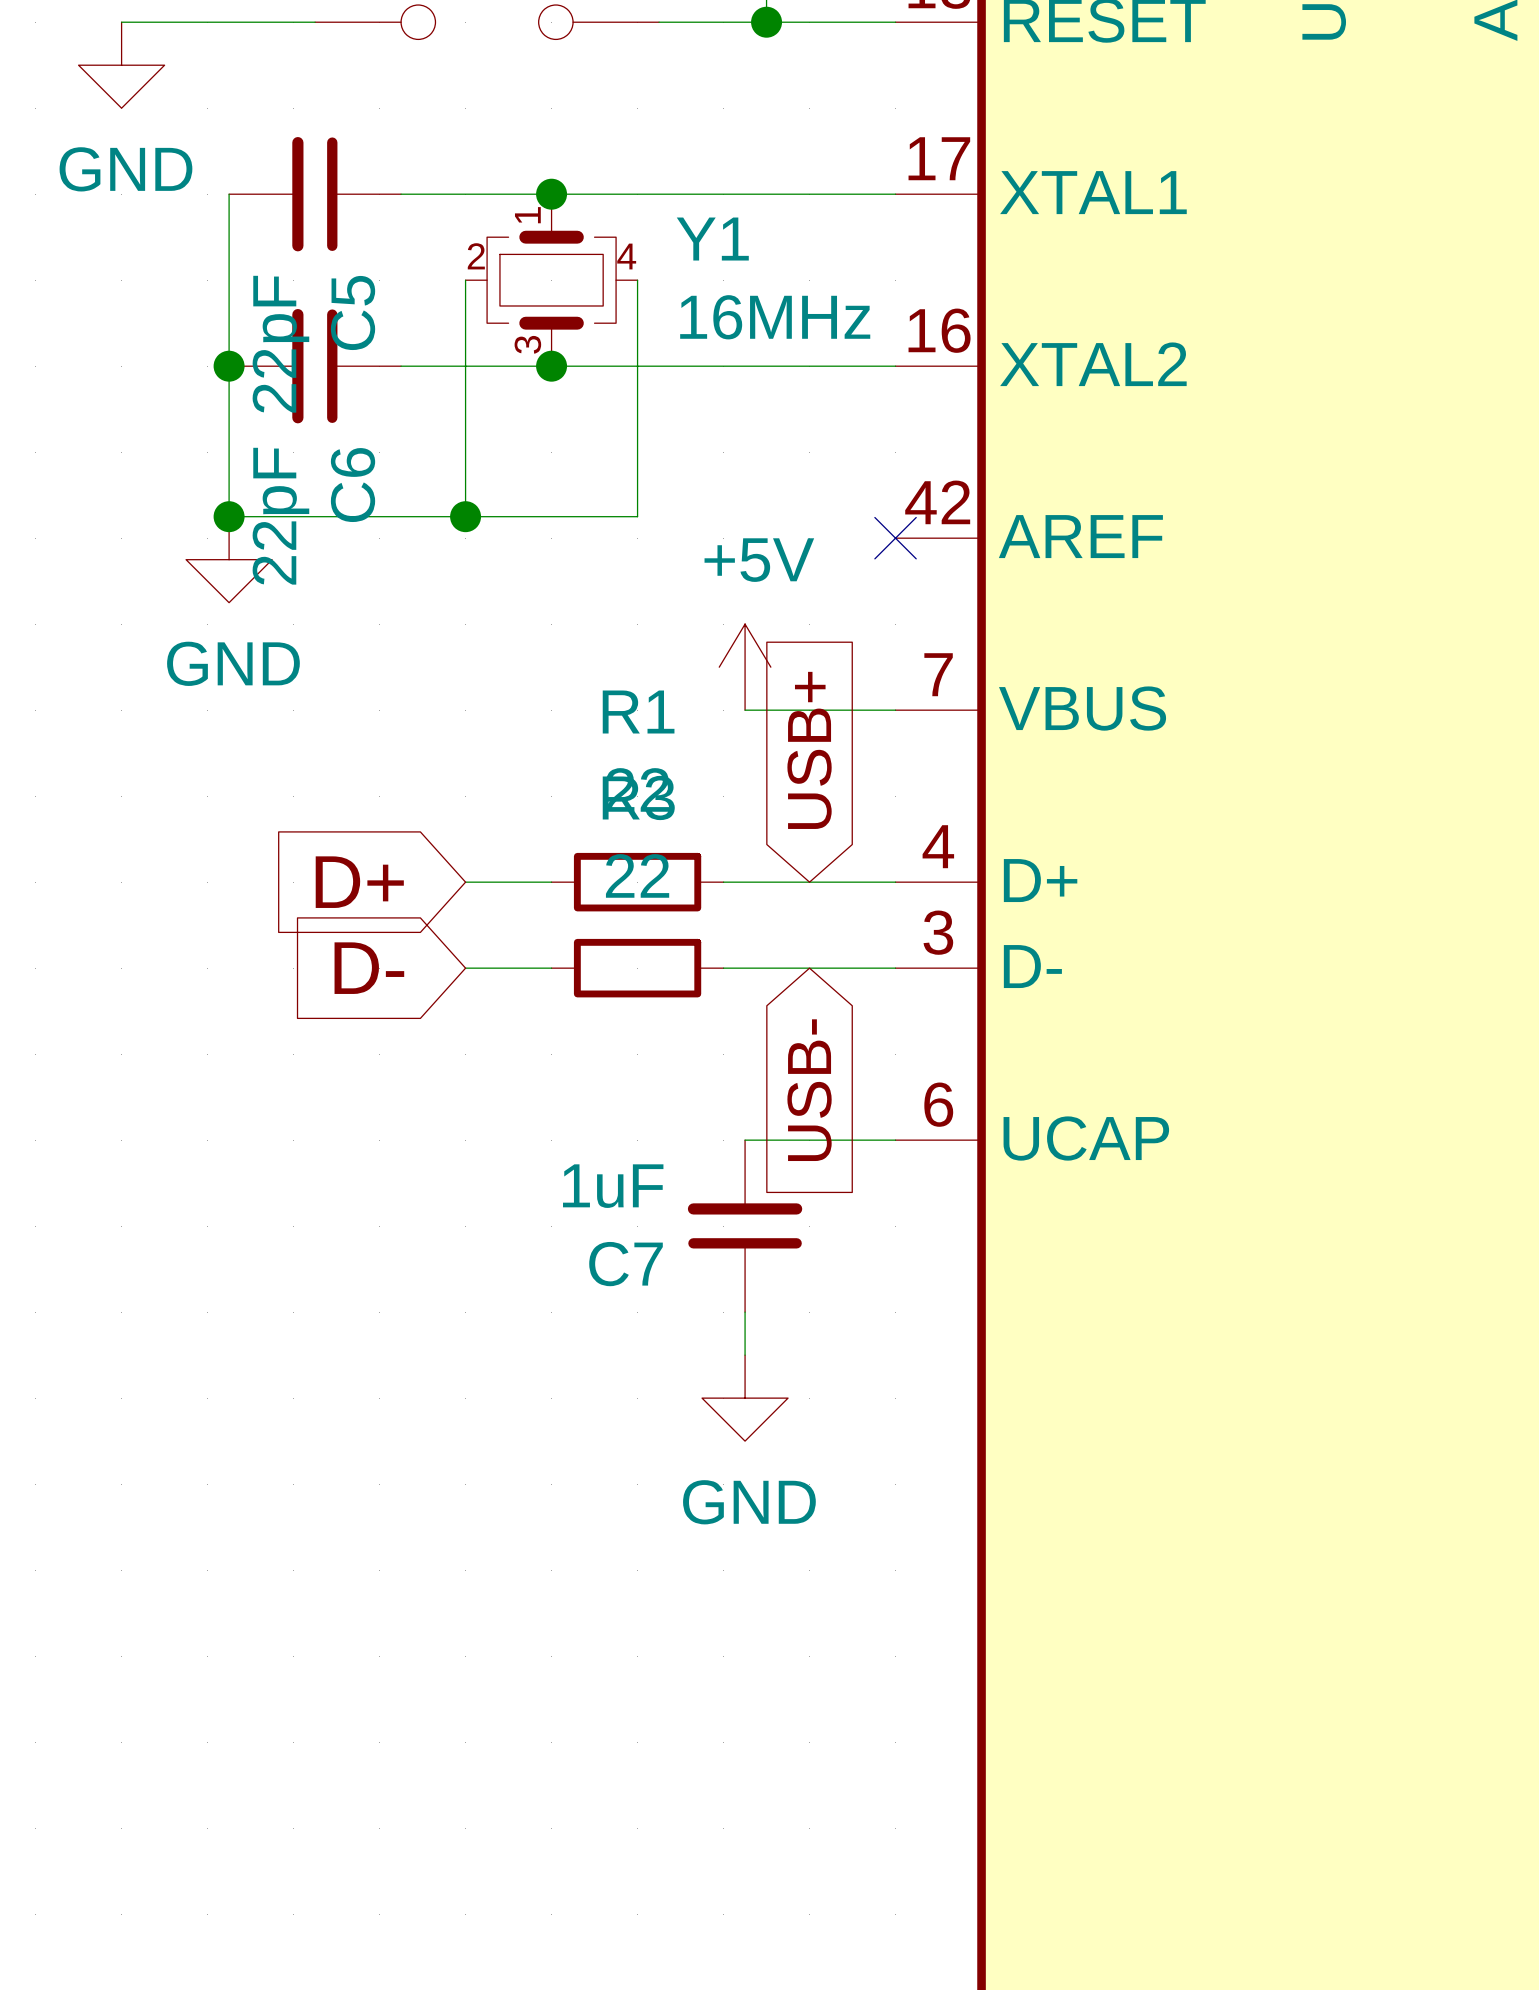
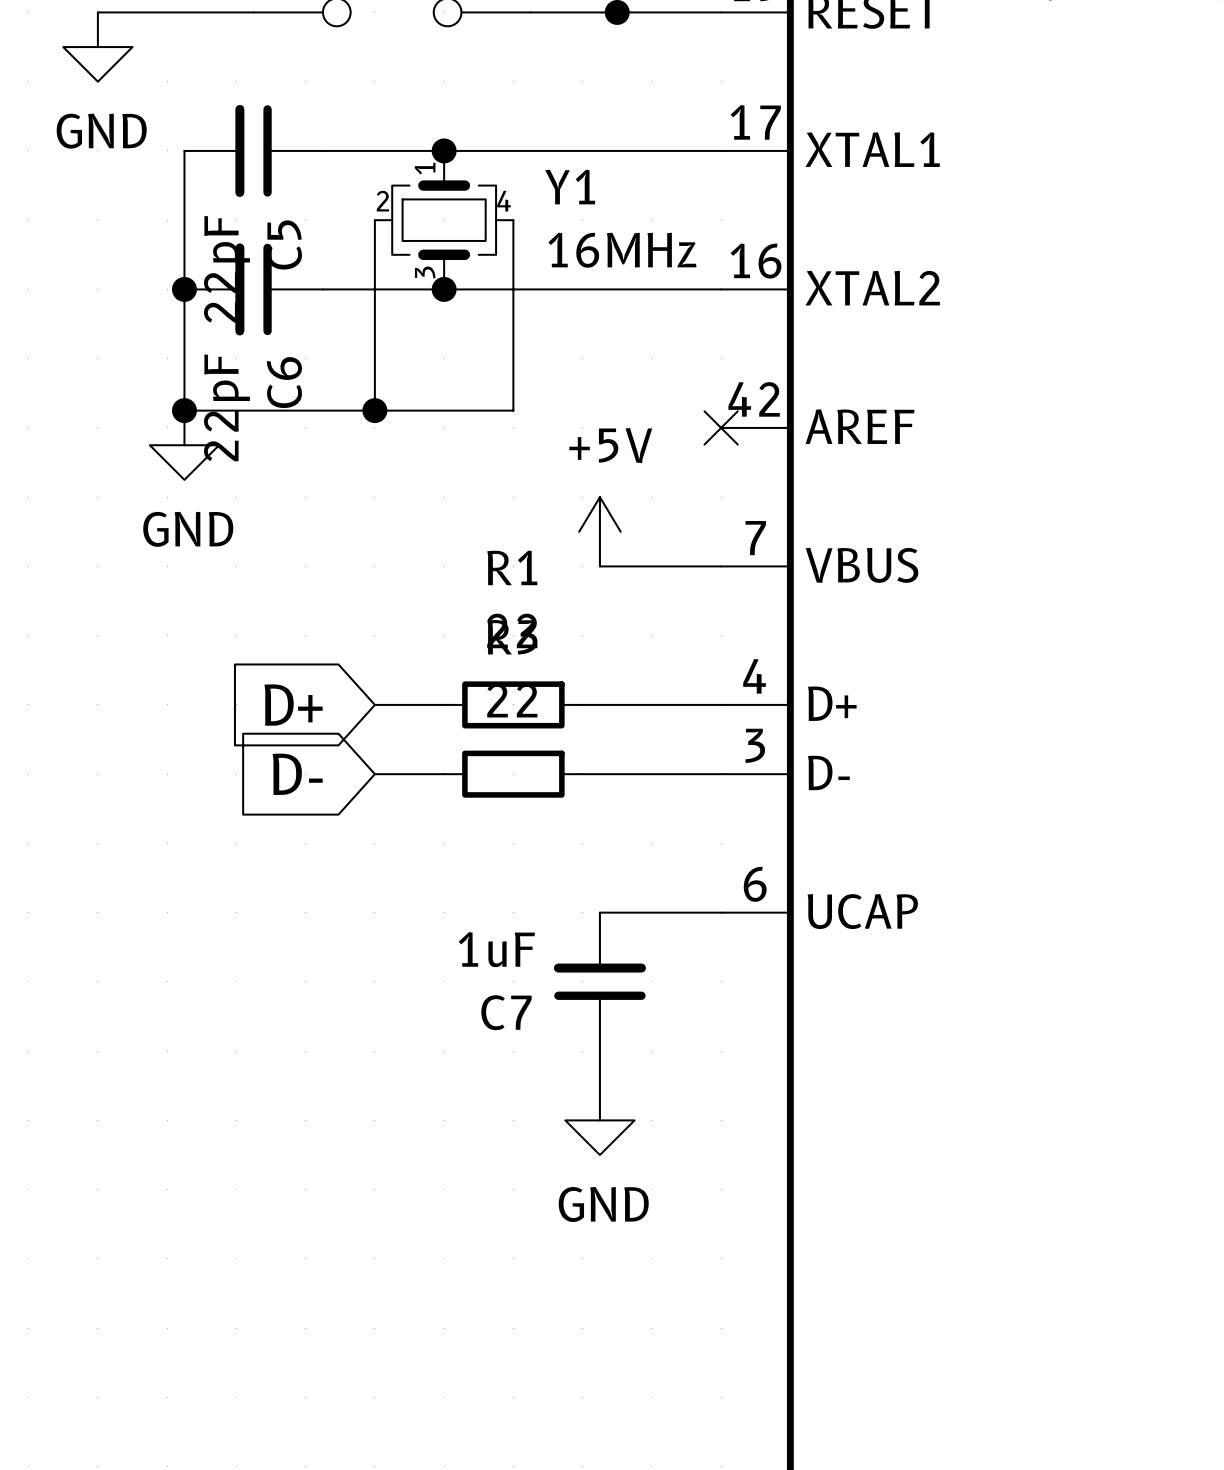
global label: USB+ (809, 750) -> none
global label: USB- (809, 1090) -> none

